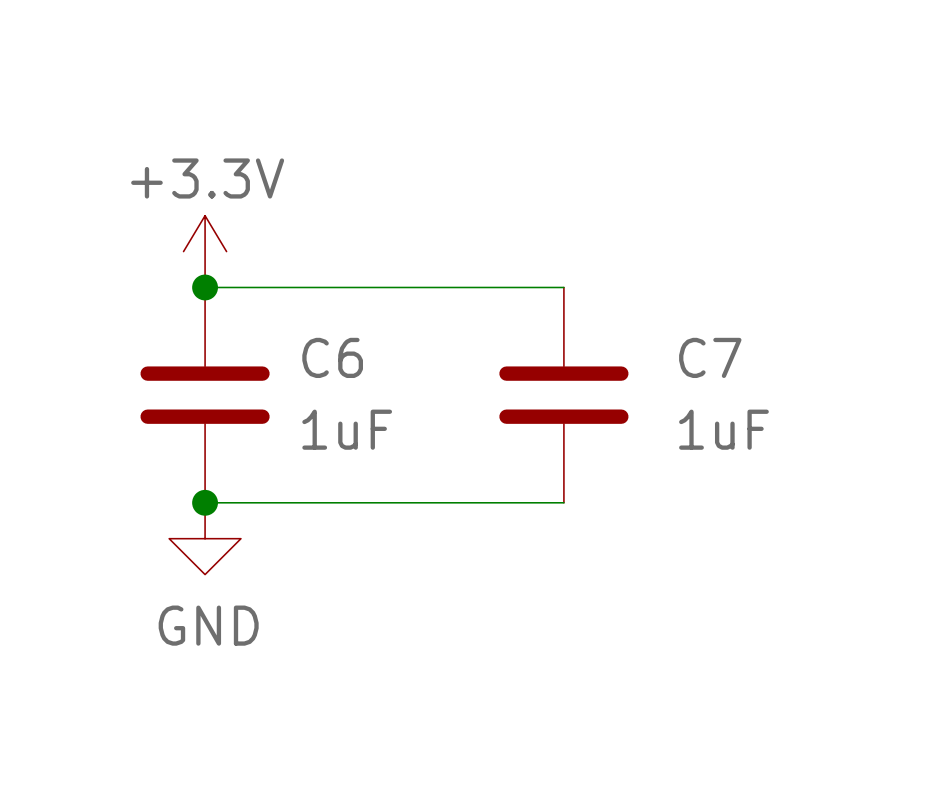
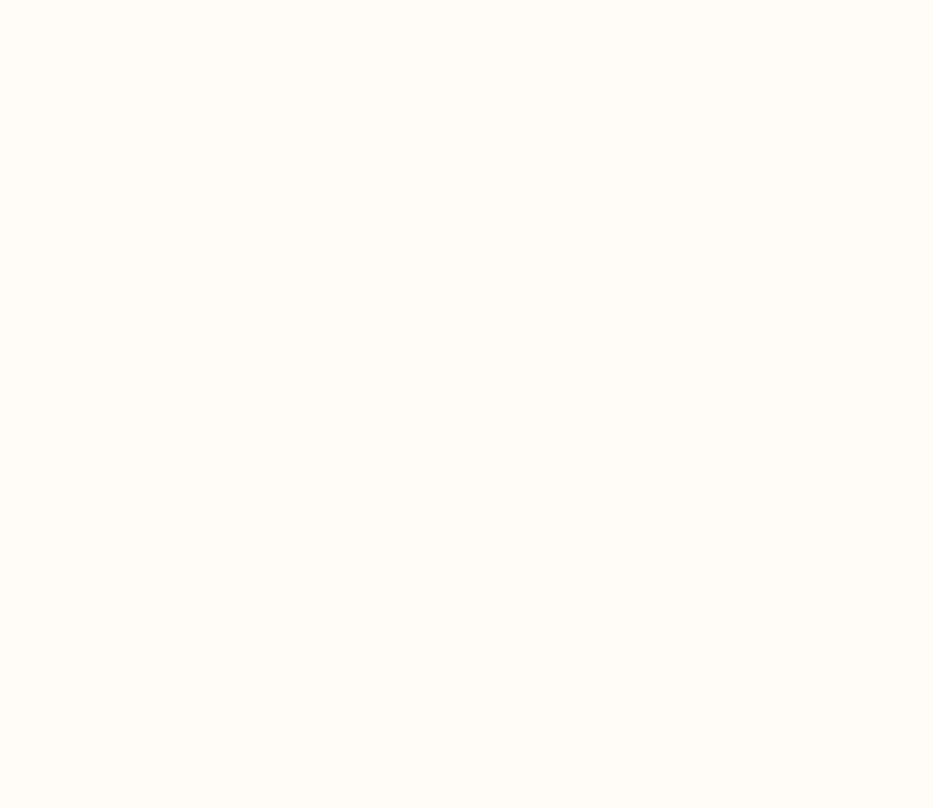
power symbol: +3.3V (205, 251) -> none
wire: (205, 287) (563, 287) -> none
junction: (205, 287) -> none
C6: 1uF (205, 395) -> none
C7: 1uF (563, 395) -> none
wire: (205, 502) (563, 502) -> none
junction: (205, 502) -> none
power symbol: GND (205, 538) -> none

